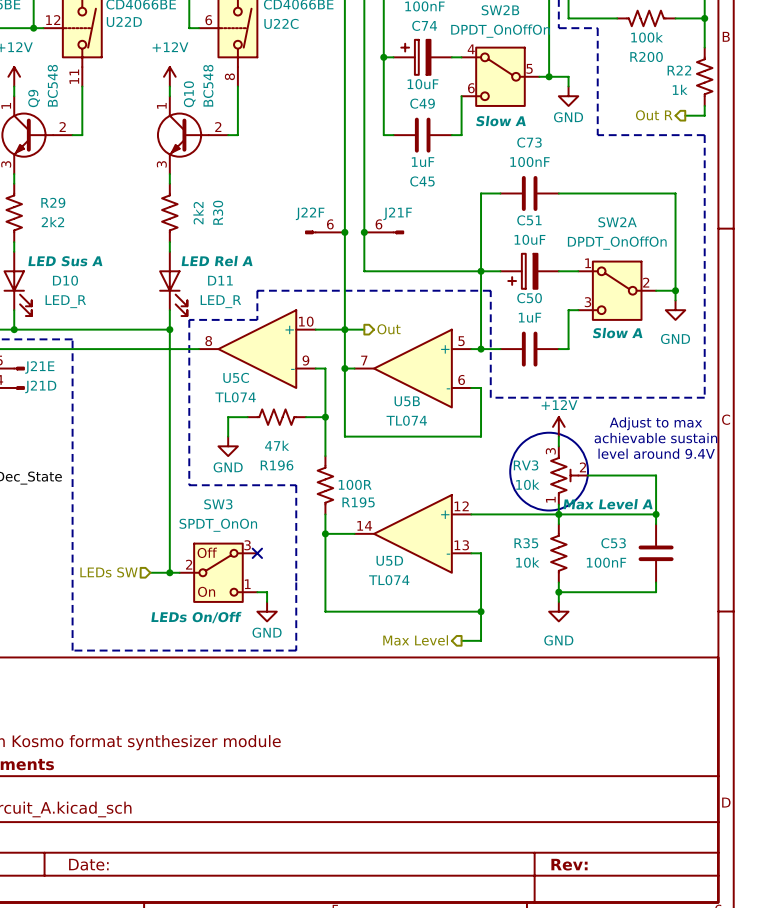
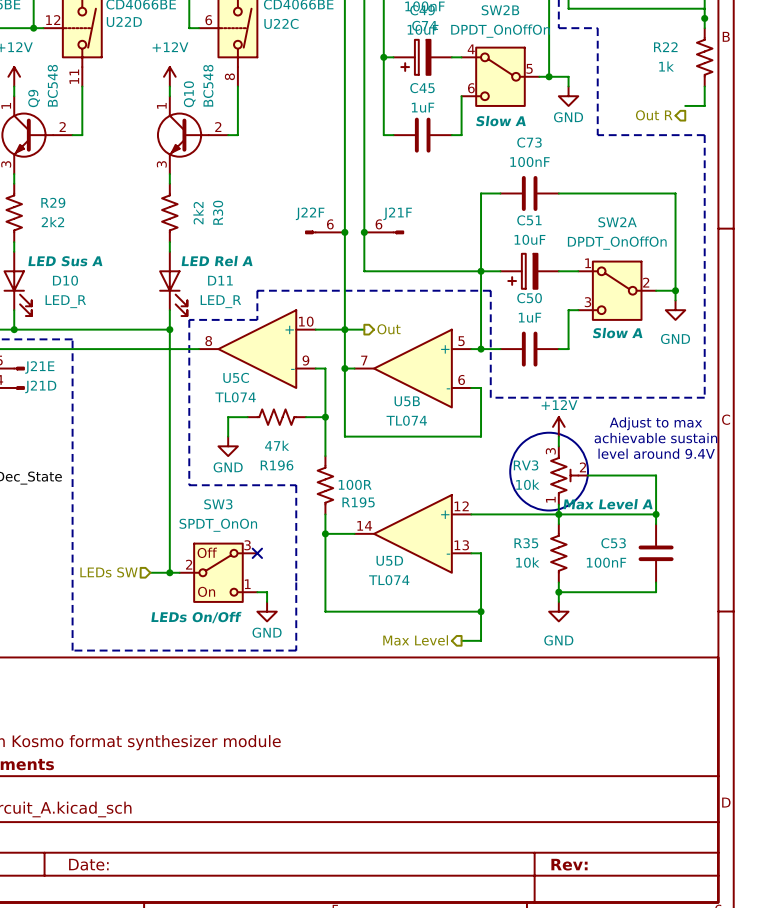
wire: (568, 8) (568, 18) (617, 18) -> (568, 8) (704, 8)
R200: 100k (646, 18) -> none
wire: (675, 18) (704, 18) -> none
C49 flip: as is (415, 57) -> up-down (415, 57)
R22 name position: R22 (679, 70) -> R22 (665, 47)
R22 position: (704, 76) -> (704, 57)
wire: none -> (704, 86) (704, 105) (685, 105)
R22 value position: 1k (680, 89) -> 1k (666, 66)
wire: (704, 105) (704, 115) (685, 115) -> none
C45 value position: 1uF (423, 162) -> 1uF (423, 107)
C45 name position: C45 (422, 181) -> C45 (422, 88)

